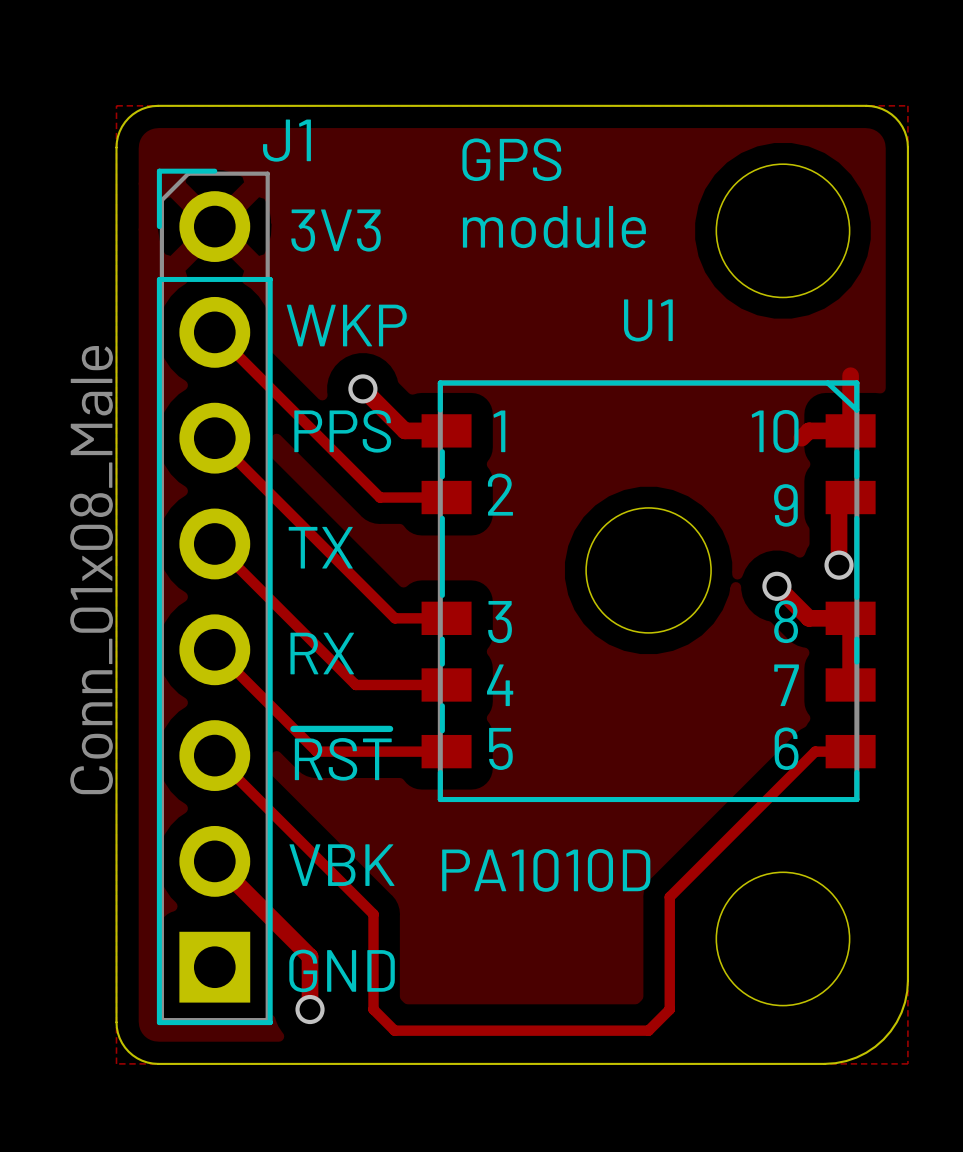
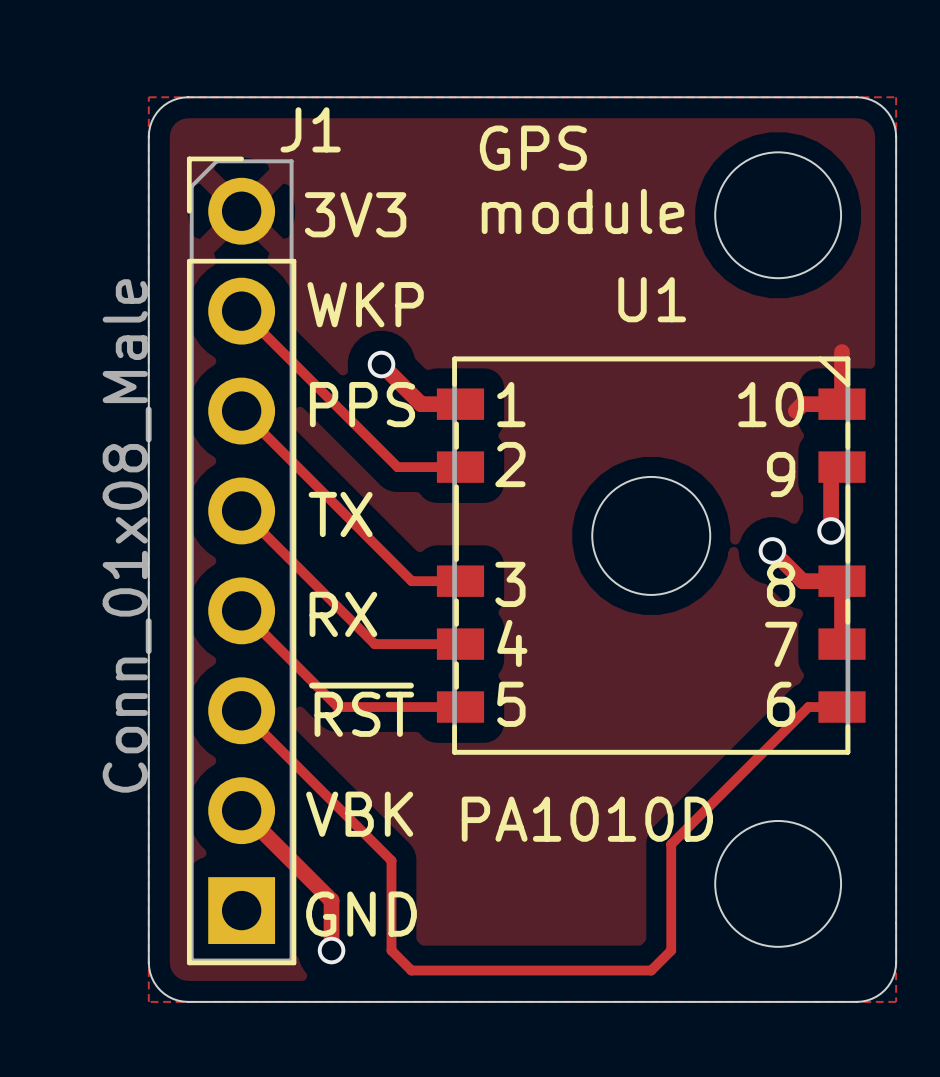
board edge: (907, 980) (901, 1012) (883, 1039) (856, 1057) (824, 1063) -> (896, 923) (895, 967) (893, 977) (884, 990) (871, 998) (861, 1001) (817, 1001)

